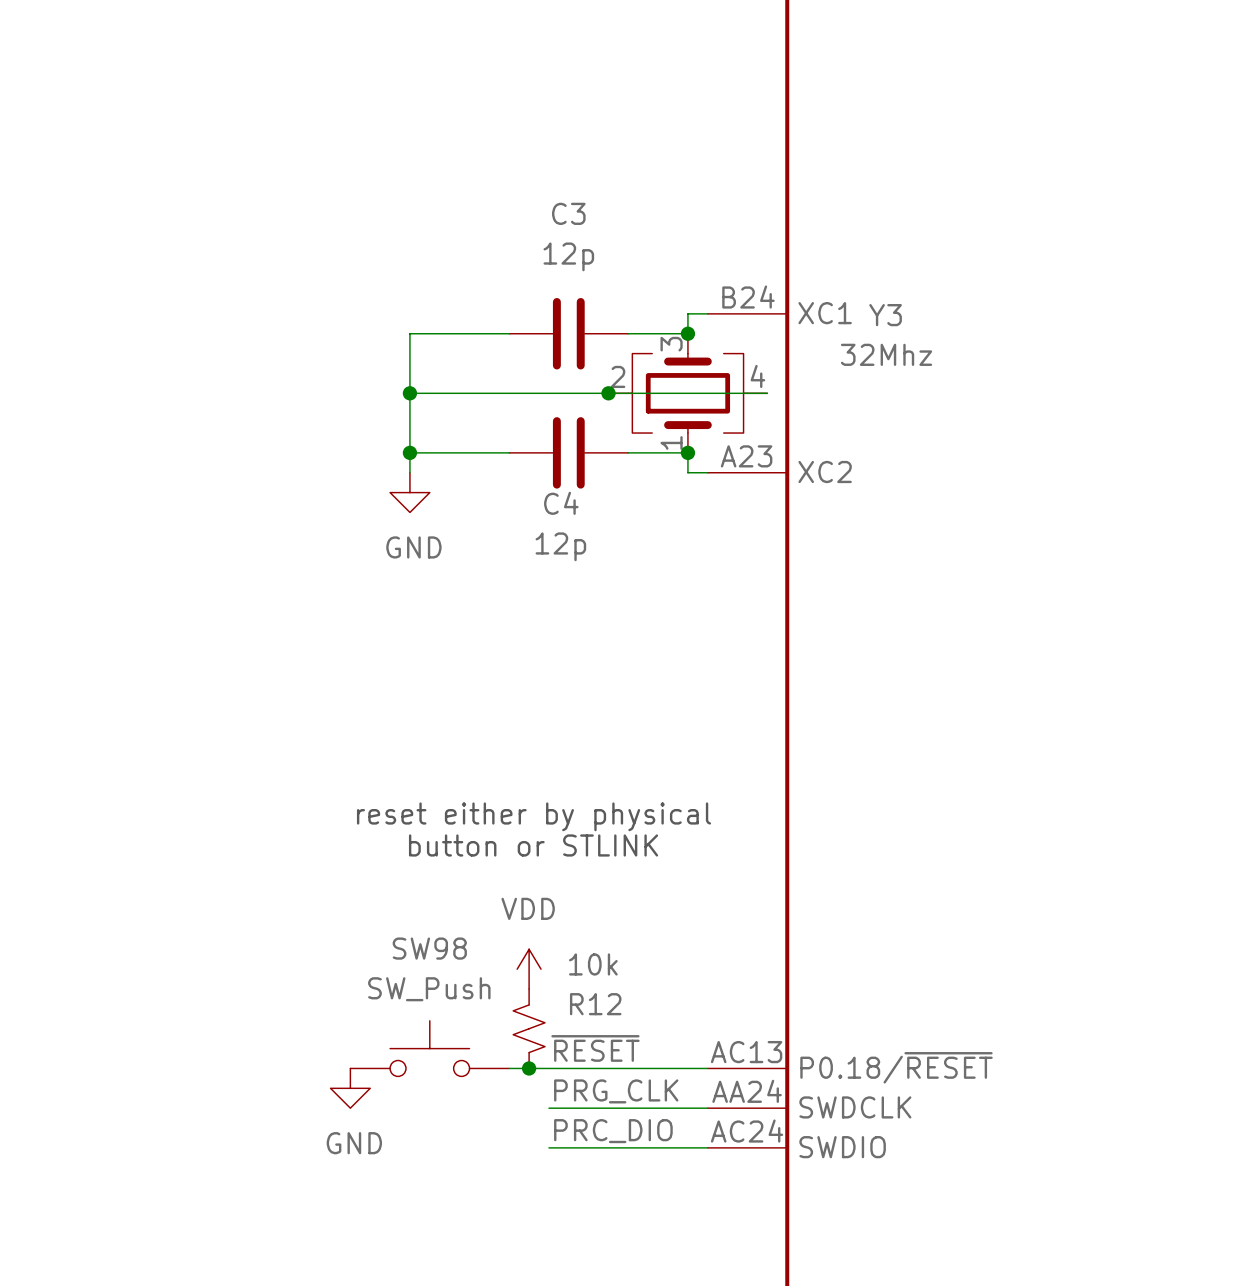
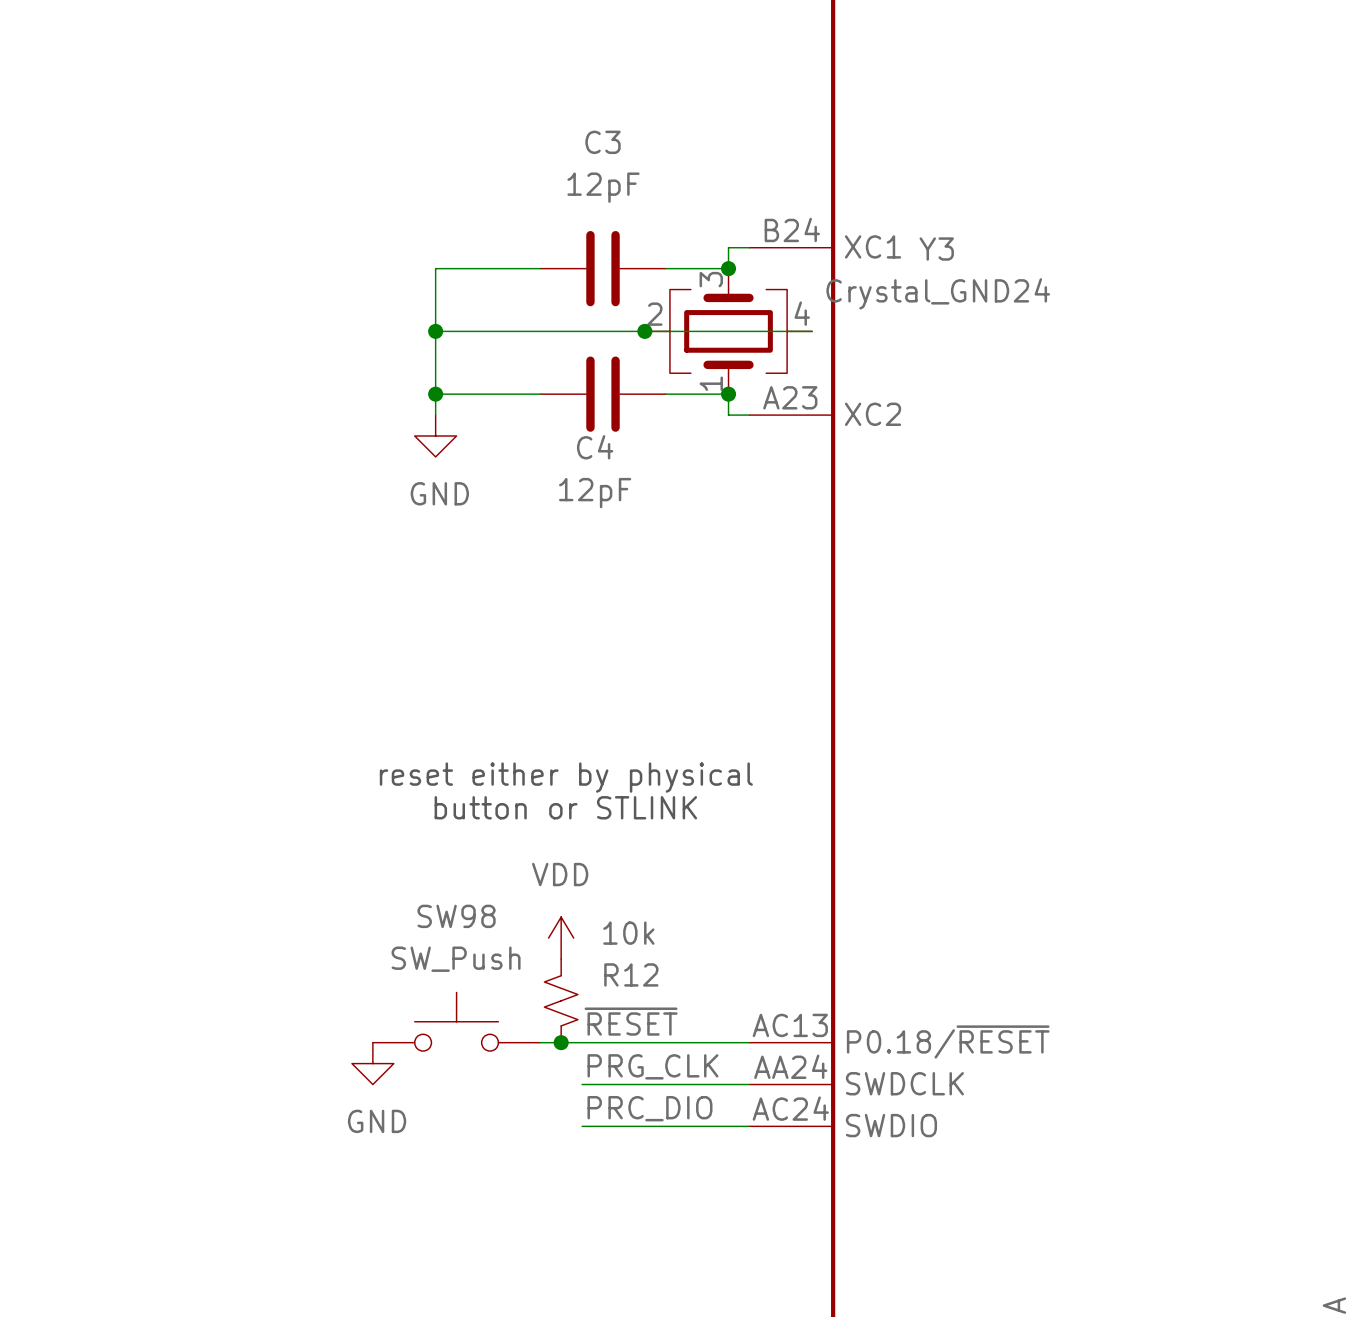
C3 value: 12p (568, 256) -> 12pF (603, 187)
Y3 value: 32Mhz (886, 354) -> Crystal_GND24 (938, 293)
C4 value: 12p (560, 546) -> 12pF (595, 493)

